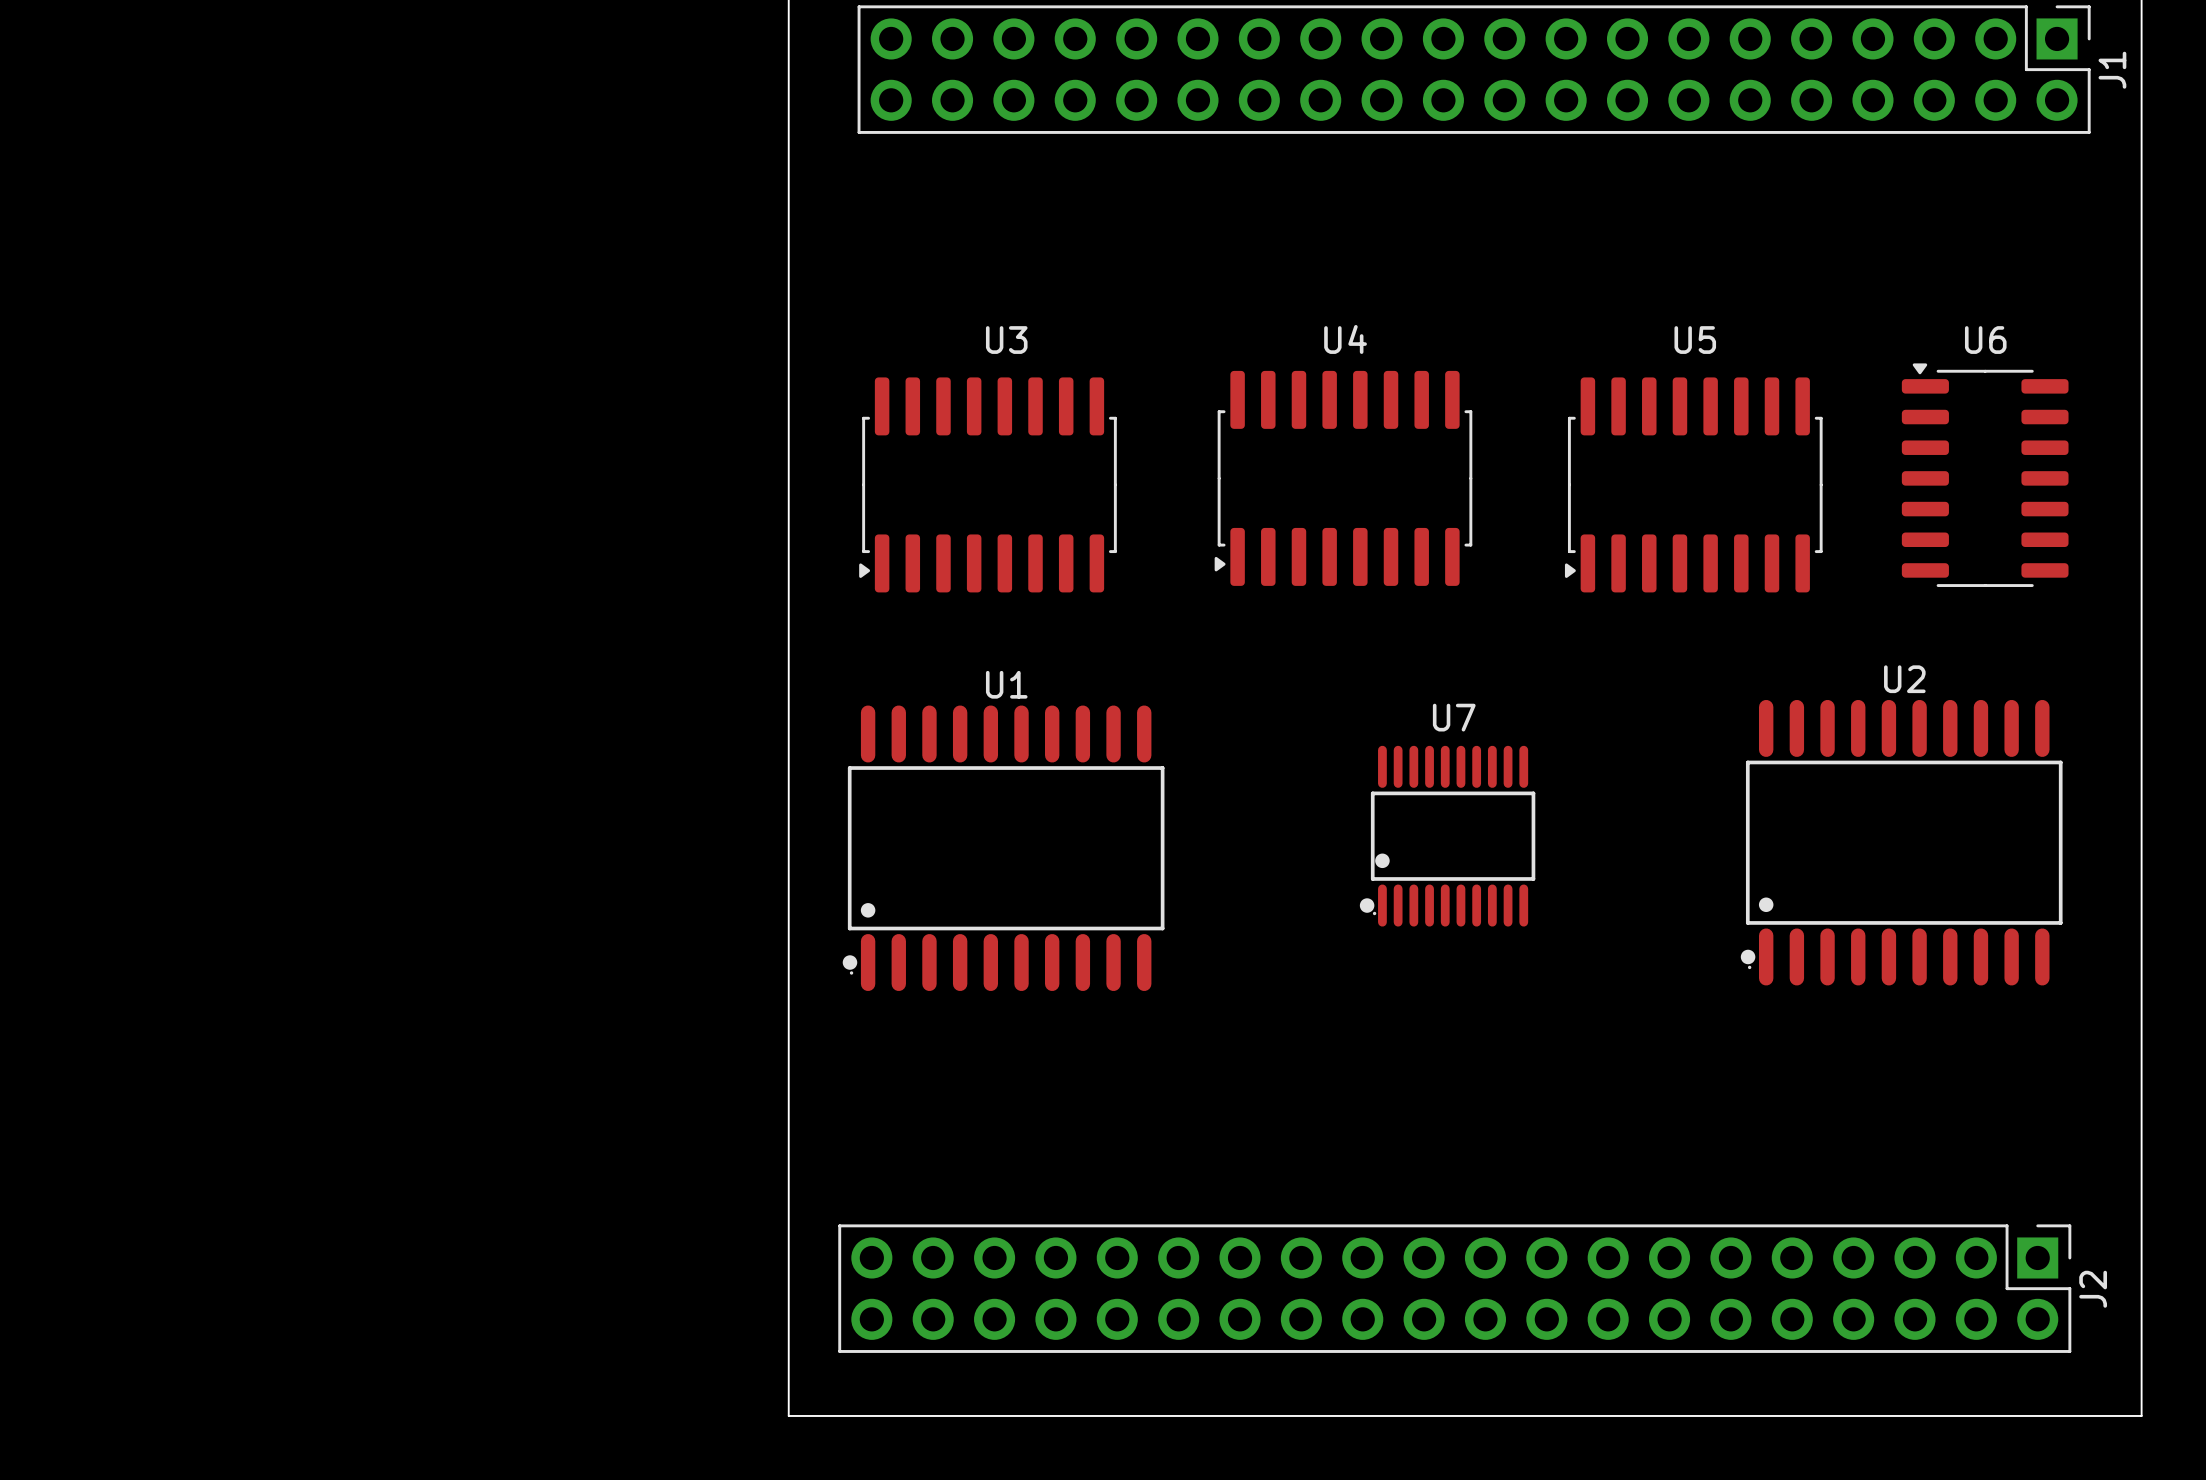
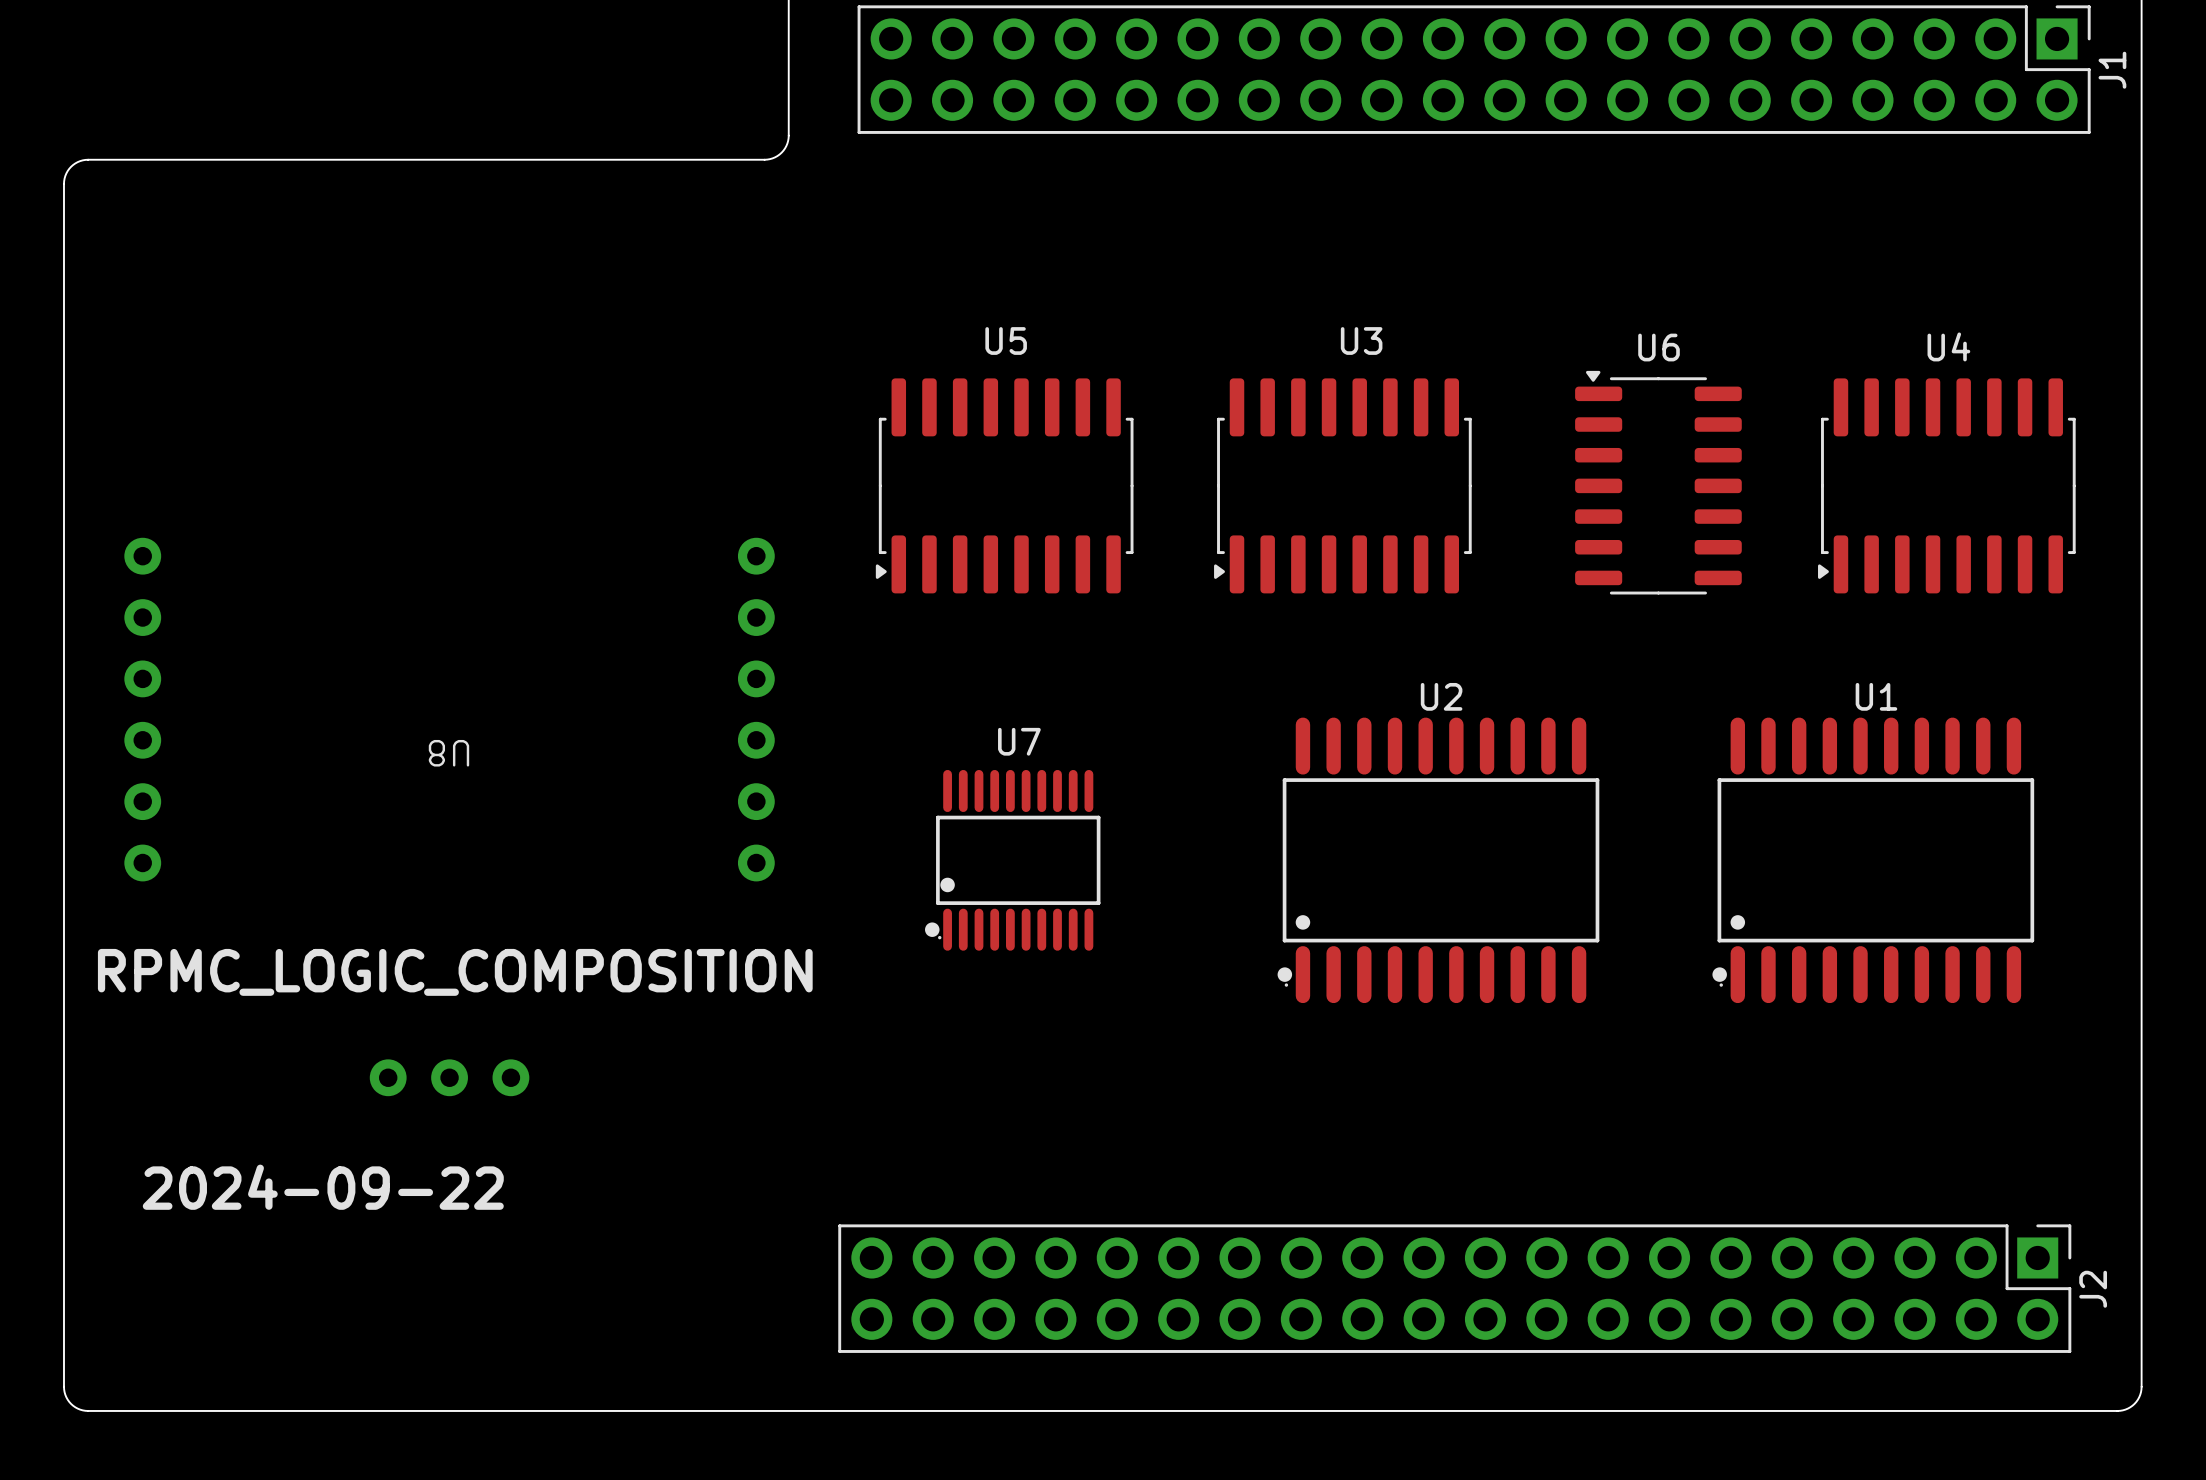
board edge: (788, 135) (788, 1415) (2141, 1415) (2141, 1386) -> (788, 135) (787, 143) (781, 152) (775, 157) (764, 159) (88, 159) (75, 163) (67, 171) (63, 183) (63, 1386) (65, 1394) (71, 1403) (77, 1408) (88, 1410) (2117, 1410) (2125, 1409) (2134, 1403) (2140, 1394) (2141, 1386)
U6 position: (1985, 475) -> (1658, 482)
U4 position: (1343, 478) -> (1946, 485)
U3 position: (987, 484) -> (1342, 485)
U5 position: (1693, 484) -> (1004, 485)
U8: none -> (449, 816)
U7 position: (1447, 836) -> (1012, 860)
U2 position: (1901, 842) -> (1438, 860)
U1 position: (1003, 848) -> (1873, 860)
text: none -> RPMC_LOGIC_COMPOSITION (455, 972)
text: none -> 2024-09-22 (323, 1187)

